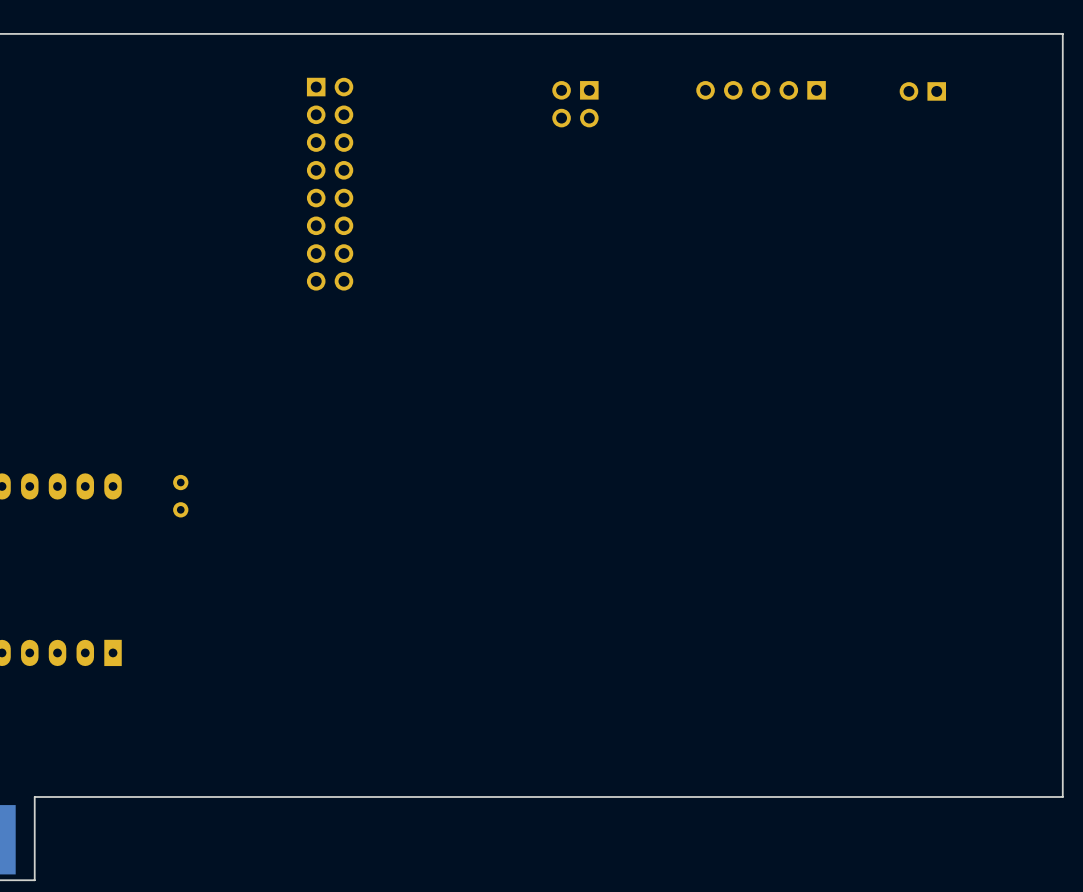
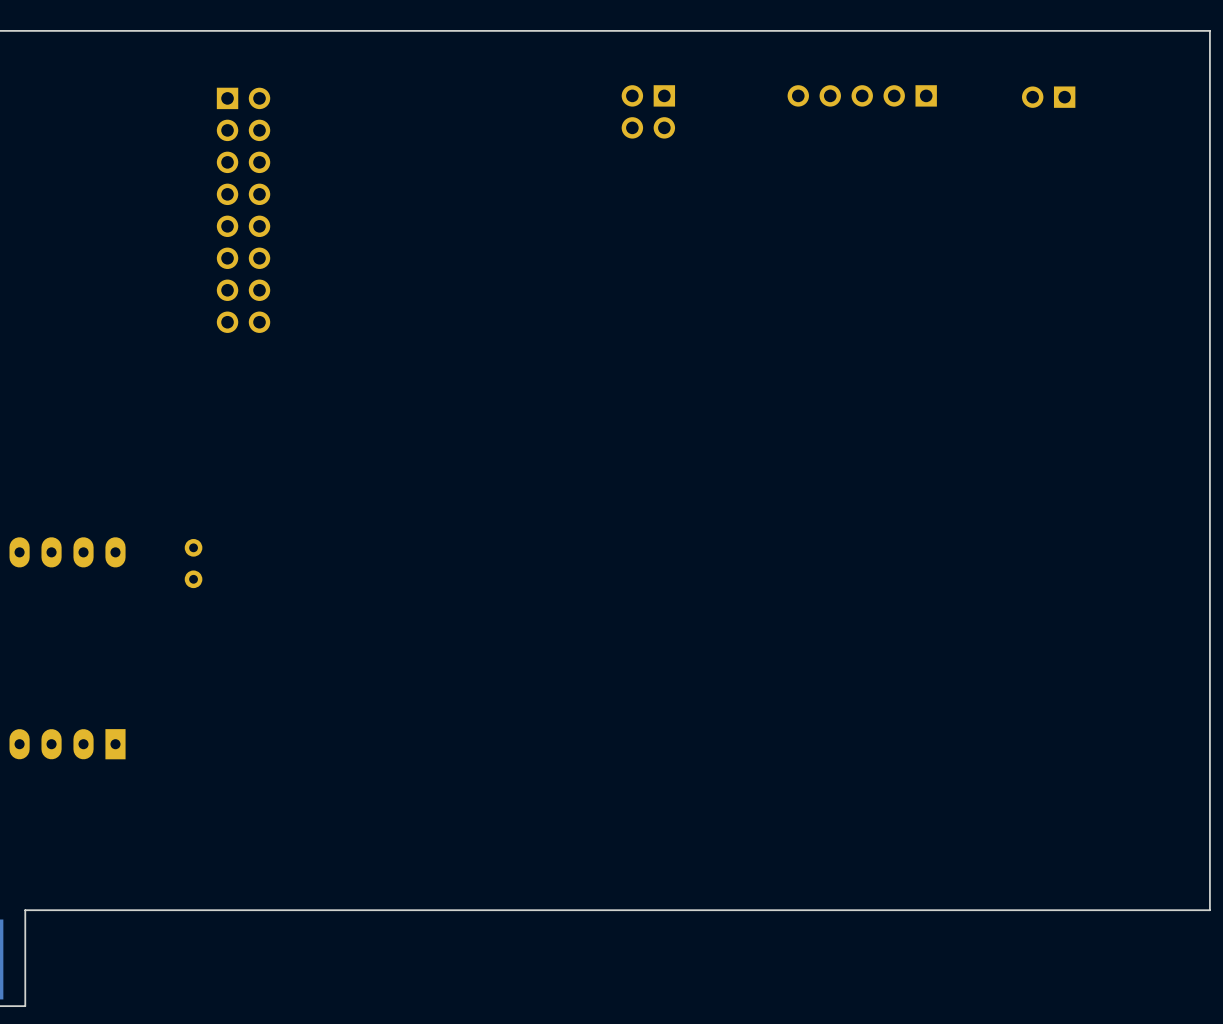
part position: (330, 184) -> (243, 210)

